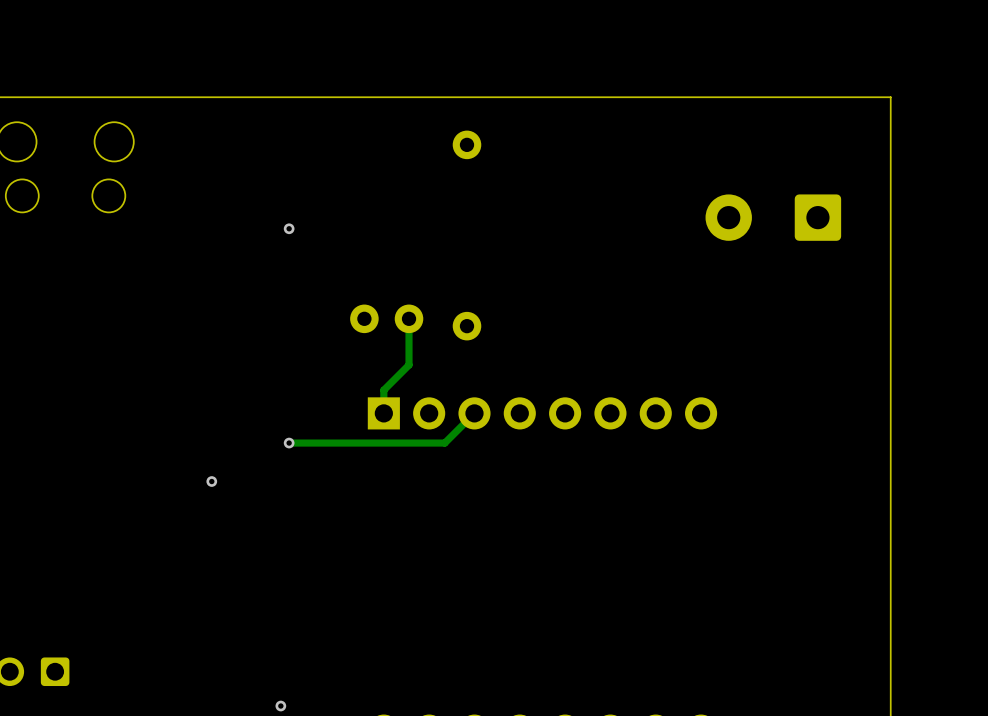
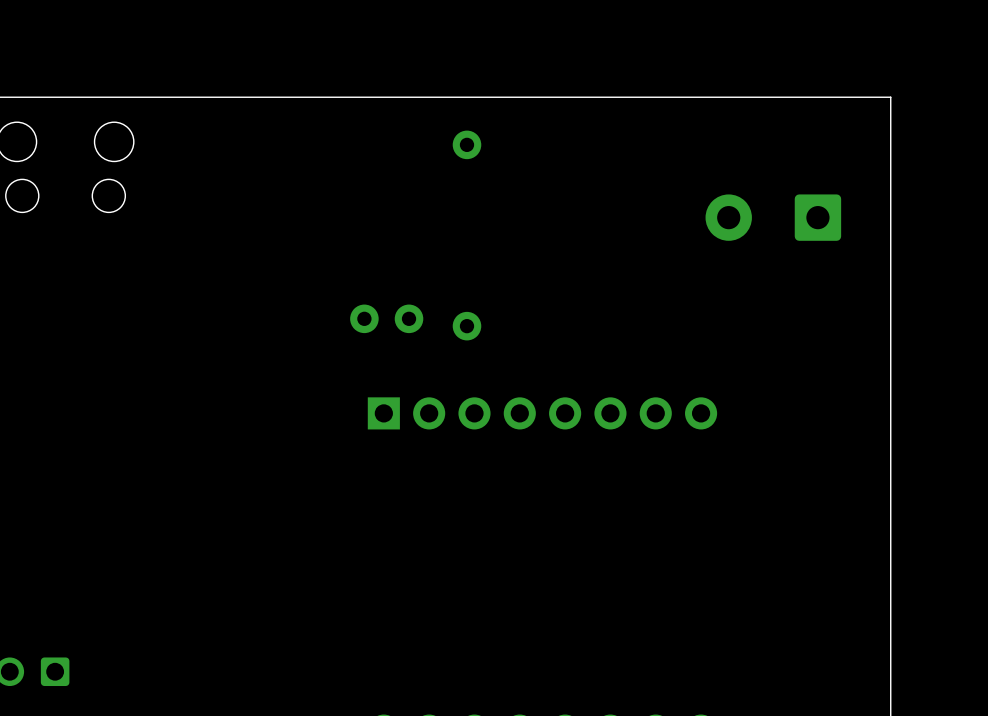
via: (289, 228) -> none
track: (409, 318) (409, 365) (383, 390) (383, 413) -> none
track: (474, 413) (444, 443) (289, 443) -> none
via: (289, 443) -> none
via: (211, 481) -> none
via: (280, 706) -> none

